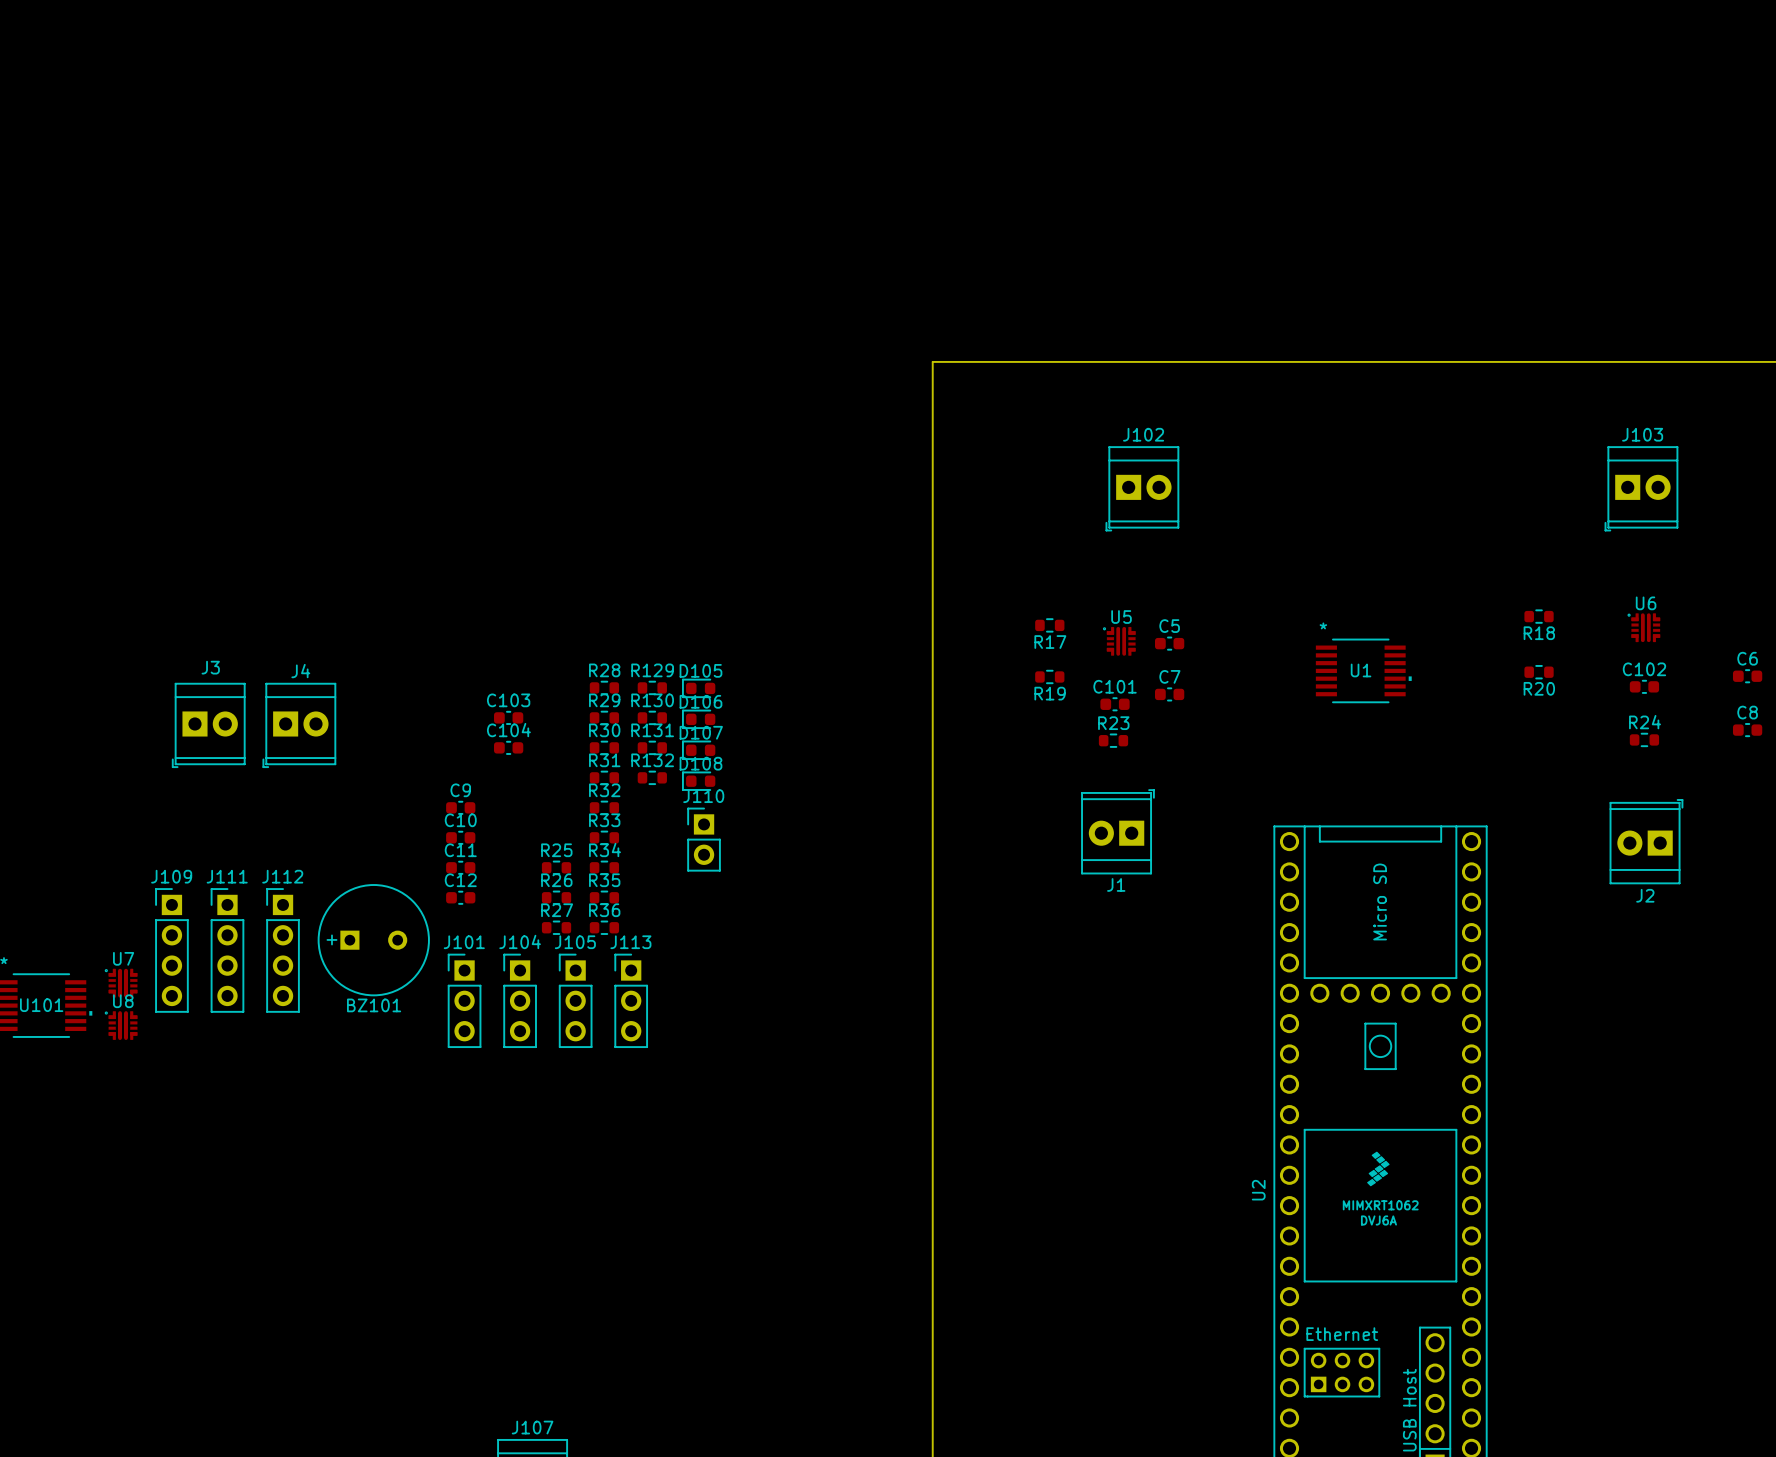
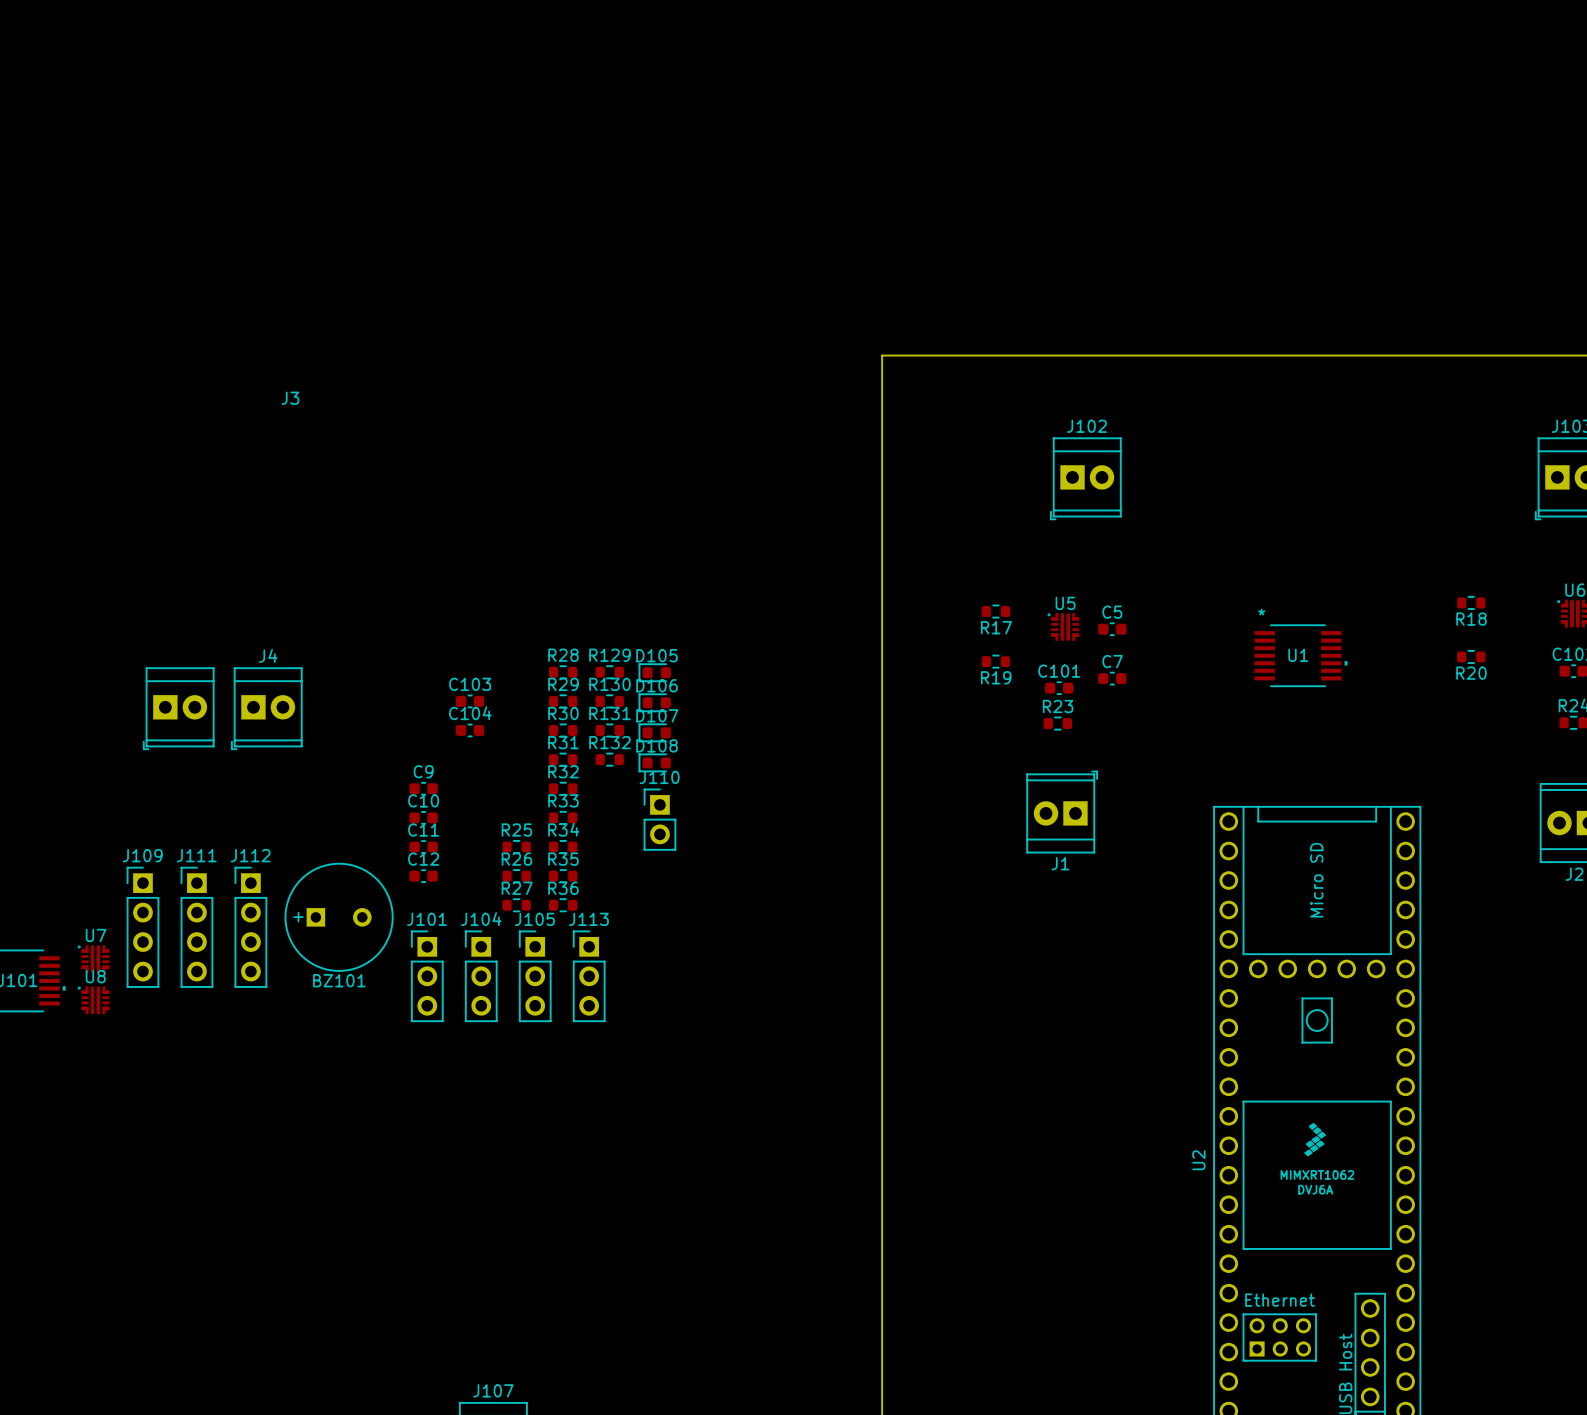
J3 name position: J3 (210, 667) -> J3 (290, 398)

